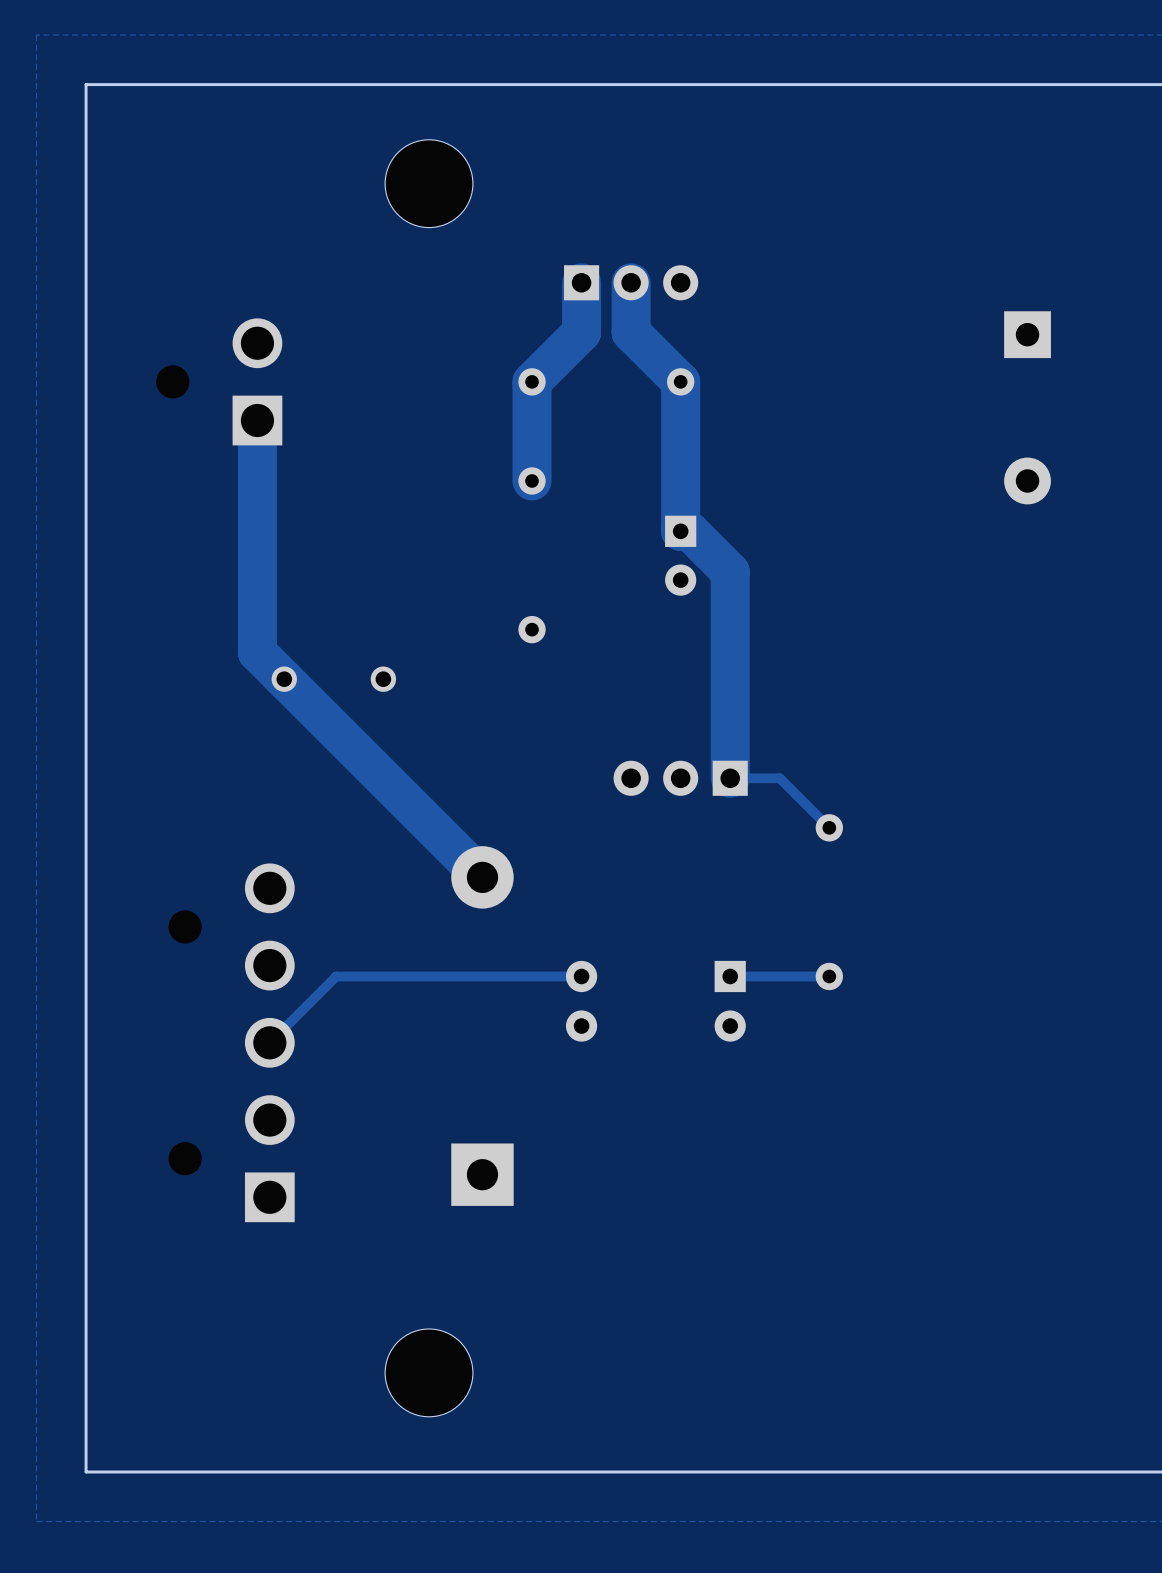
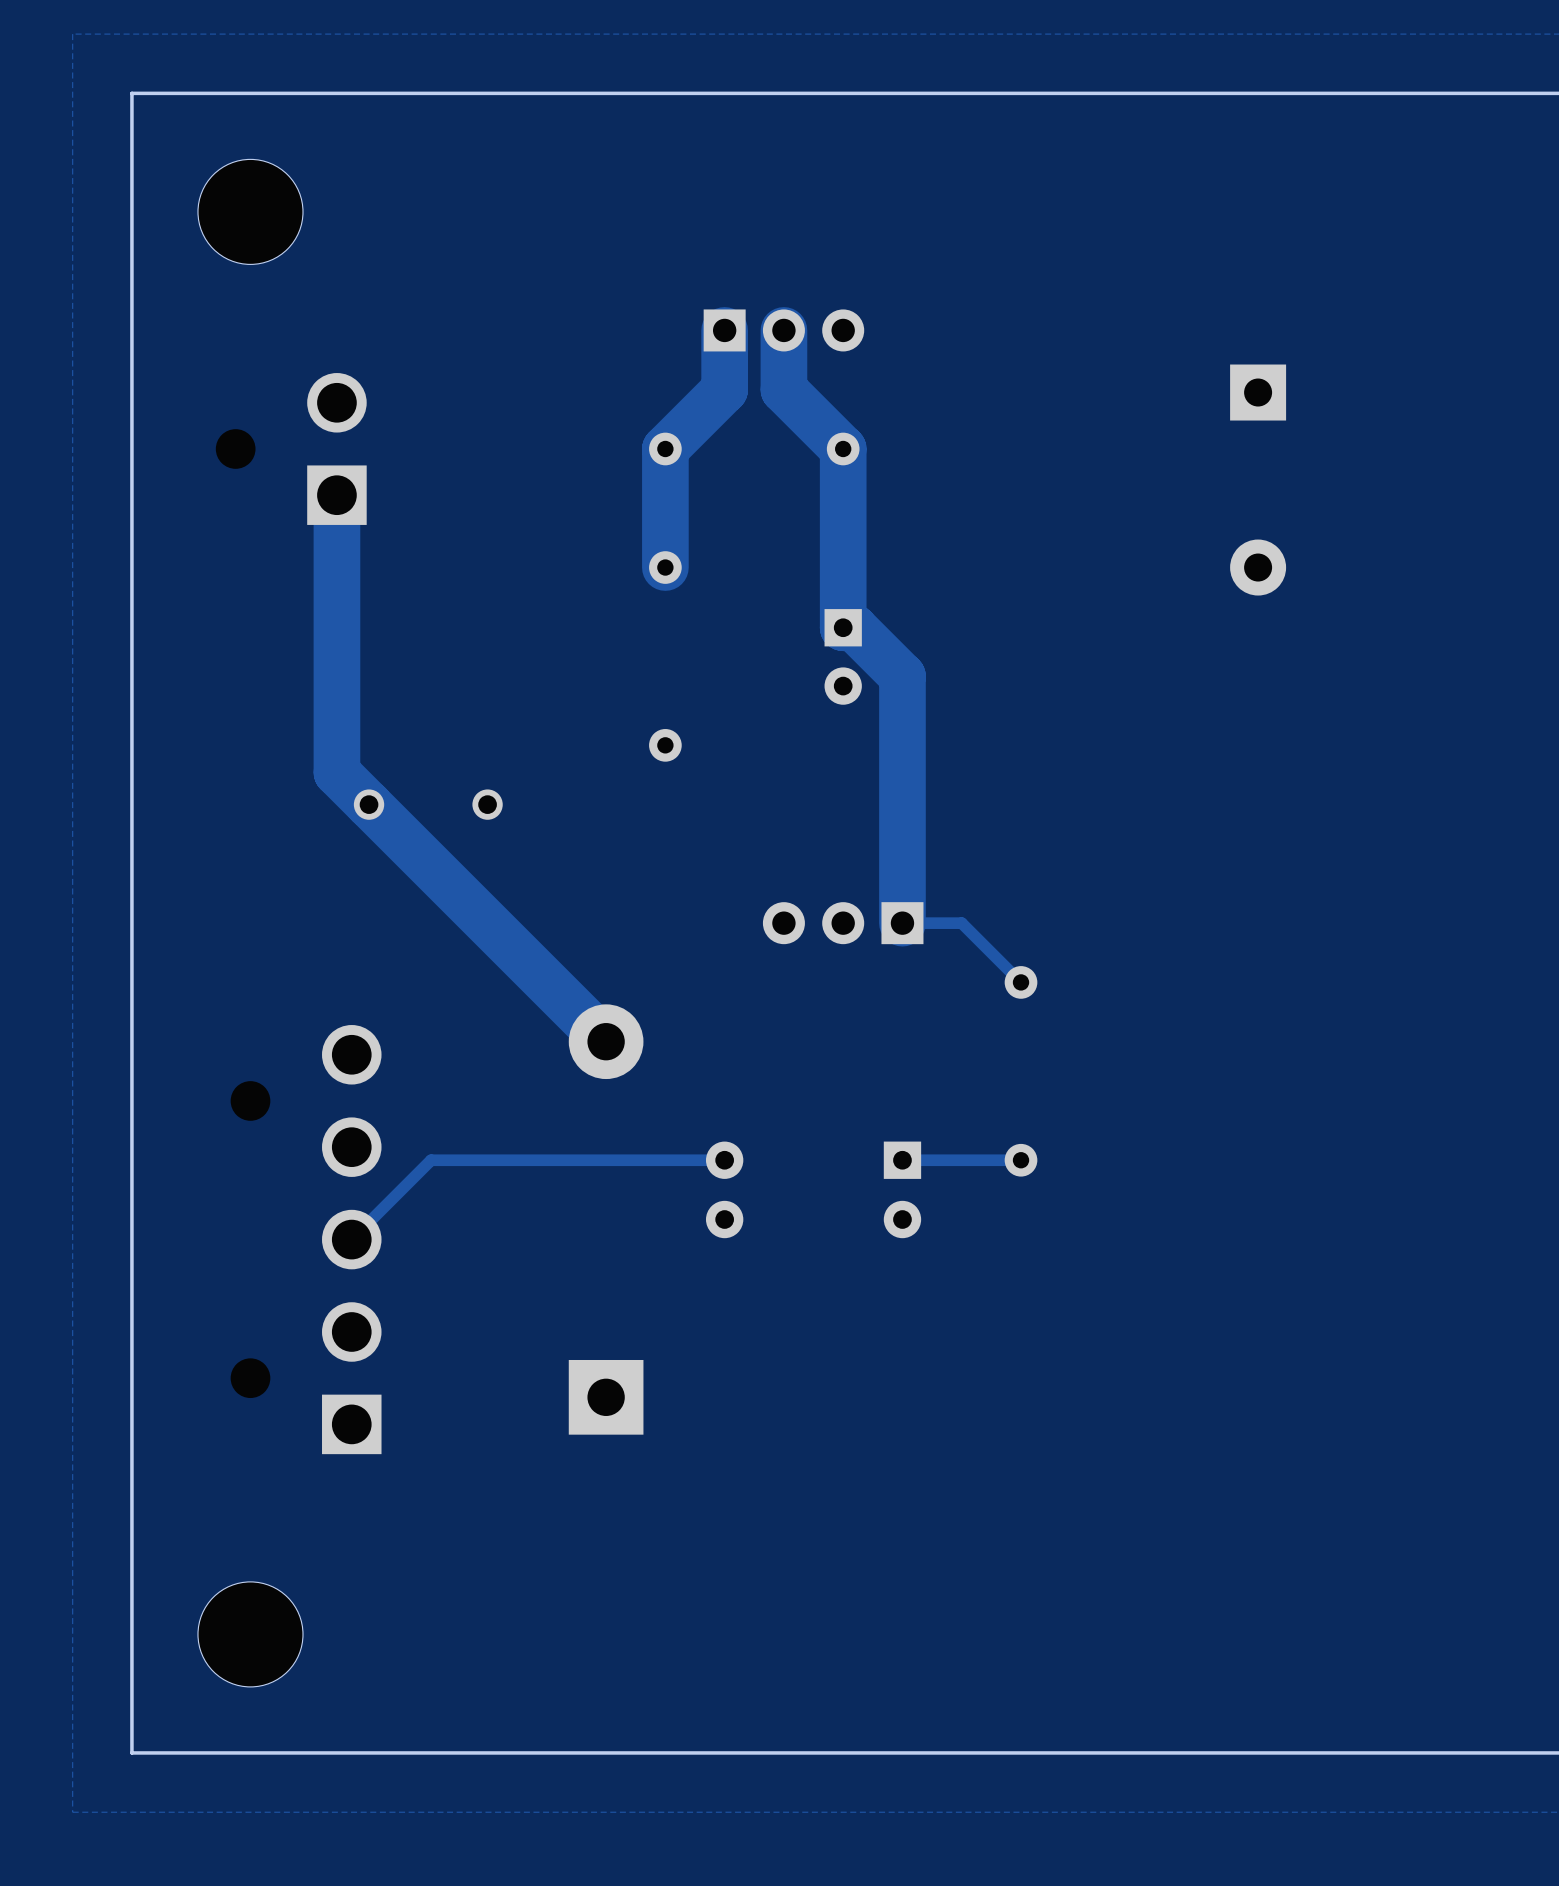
part position: (429, 183) -> (250, 211)
part position: (429, 1372) -> (250, 1634)

